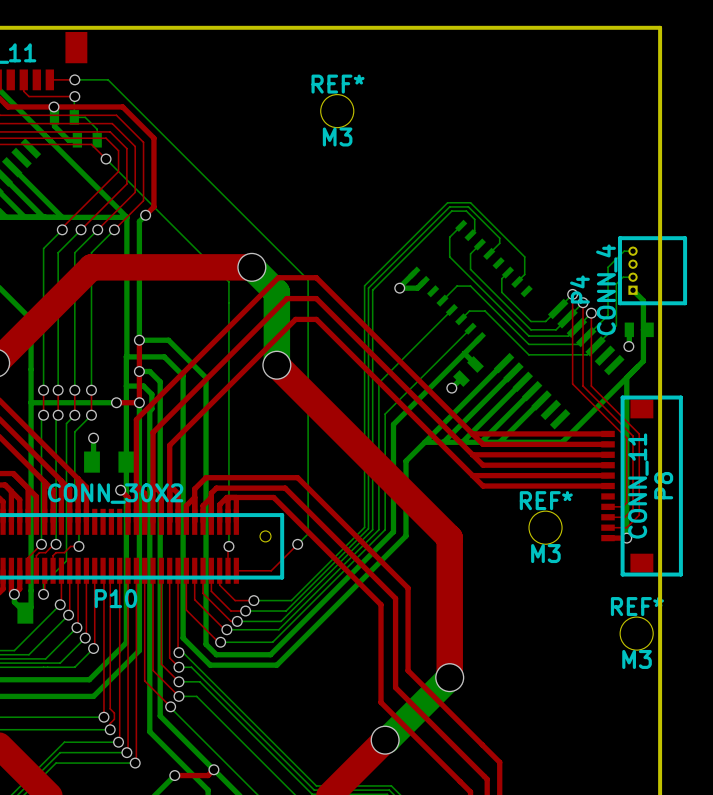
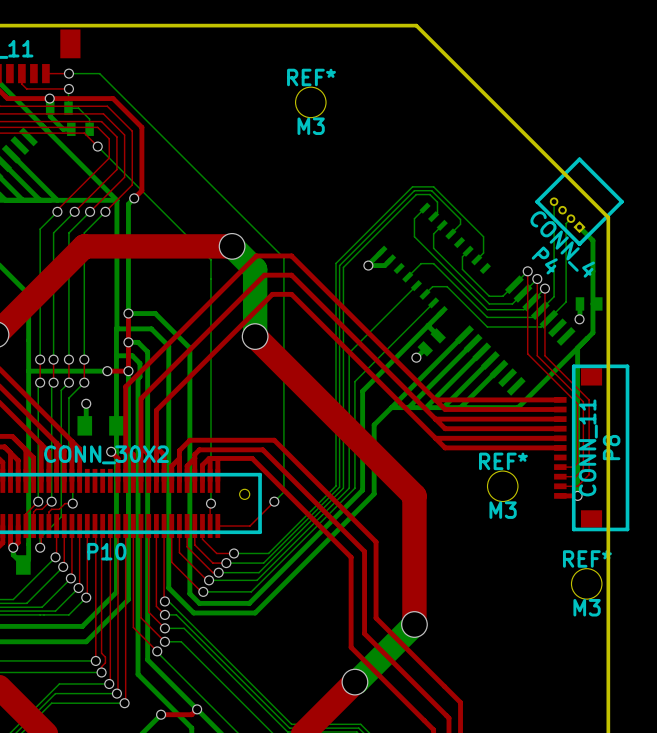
board edge: (451, 27) (660, 27) (660, 236) -> (416, 25) (608, 217)
bottom track: (633, 251) (624, 251) (608, 267) (608, 315) (601, 322) -> (554, 201) (554, 296)
P4 rotation: 0° (652, 270) -> 45° counterclockwise (579, 201)
P4 position: (652, 270) -> (579, 201)
bottom track: (633, 277) (623, 277) (616, 284) (616, 325) (614, 327) -> (571, 218) (566, 223) (566, 301)
bottom track: (633, 290) (643, 300) -> (579, 227) (592, 240) (592, 277)

